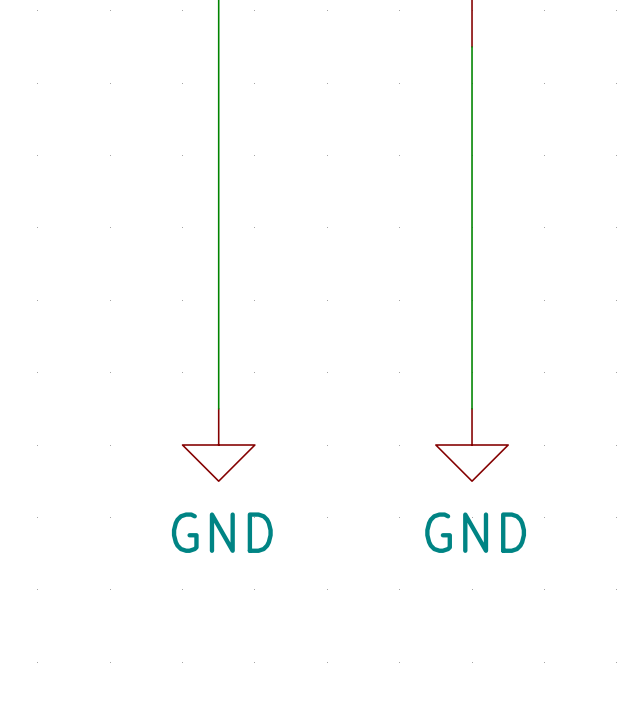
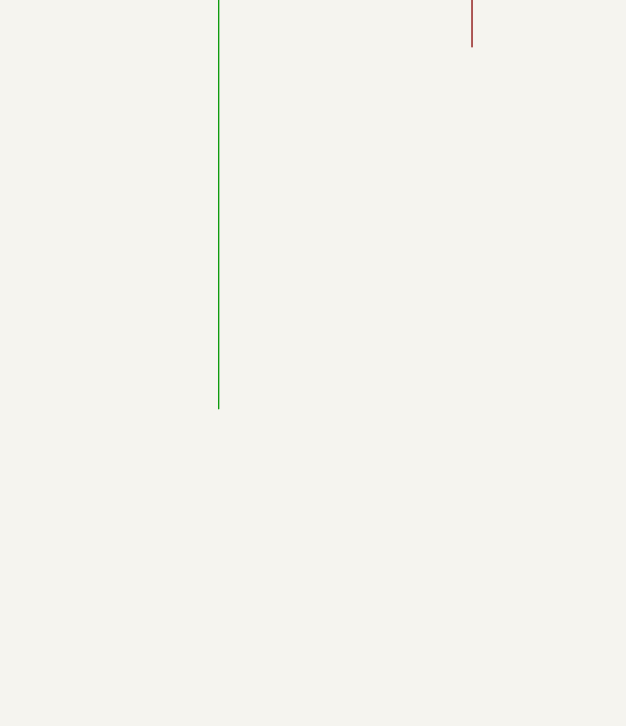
wire: (472, 46) (472, 408) -> none
power symbol: GND (218, 445) -> none
power symbol: GND (472, 445) -> none

